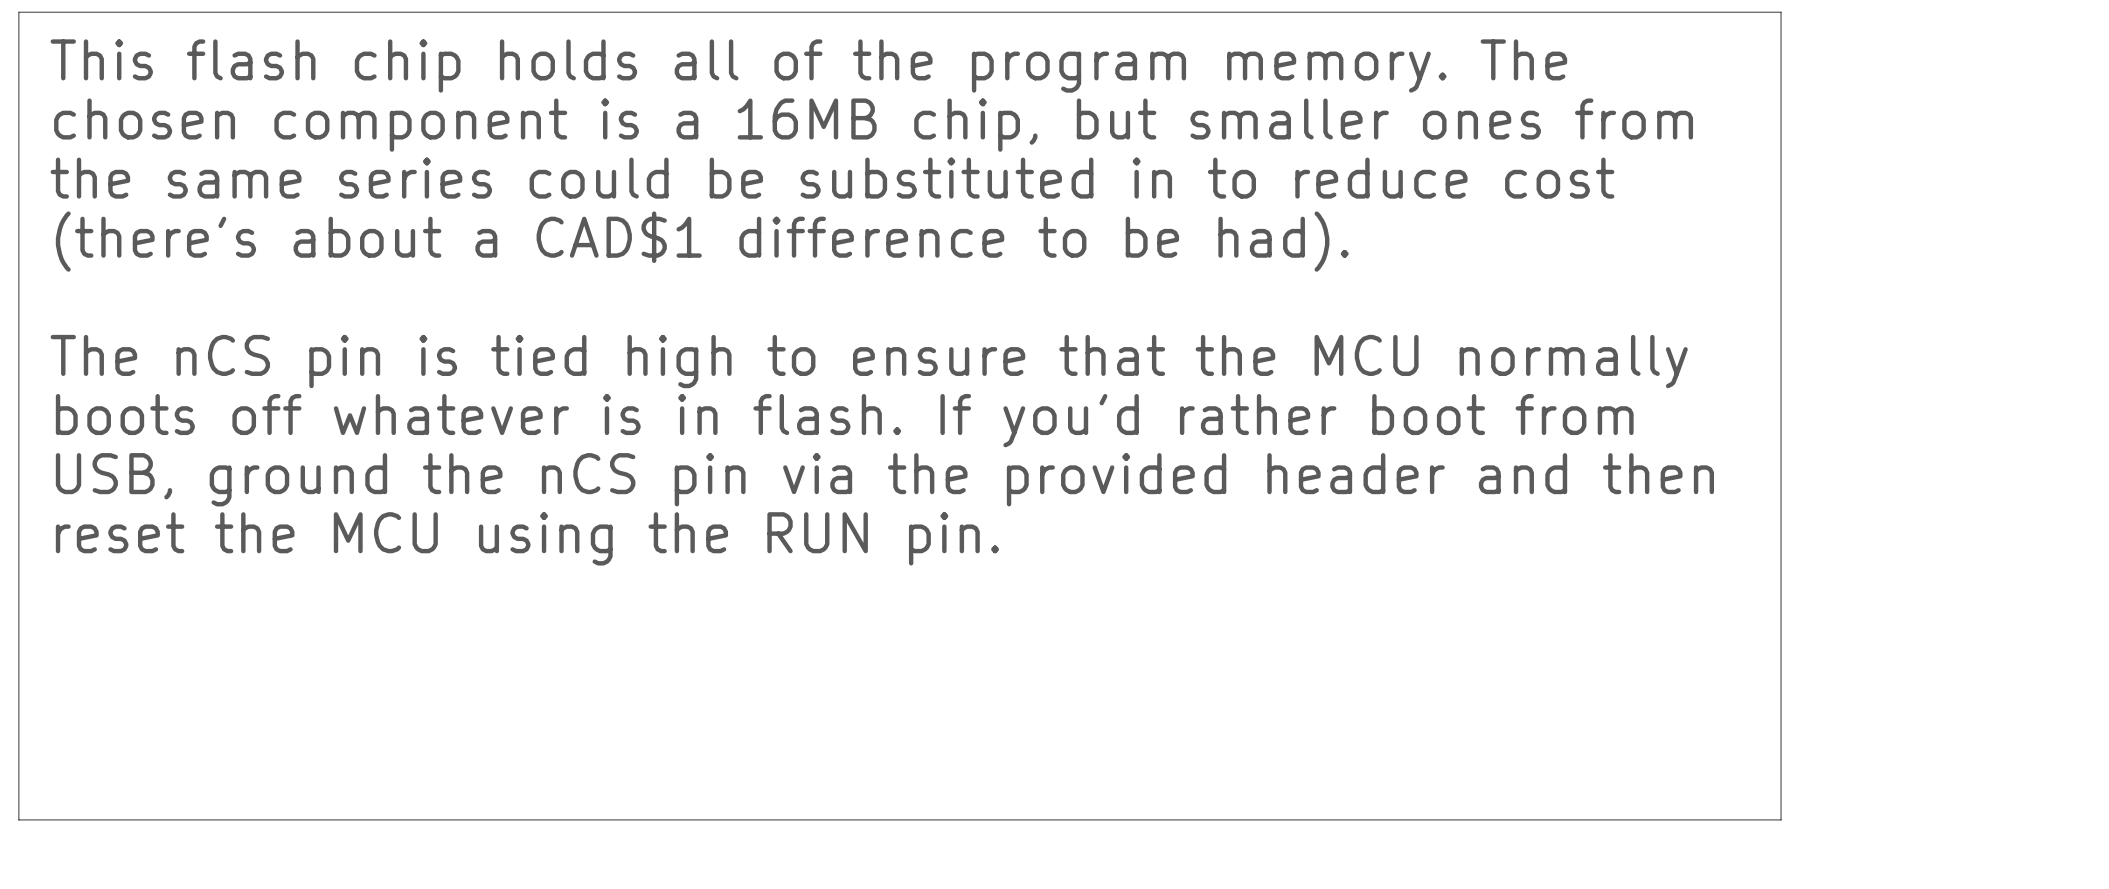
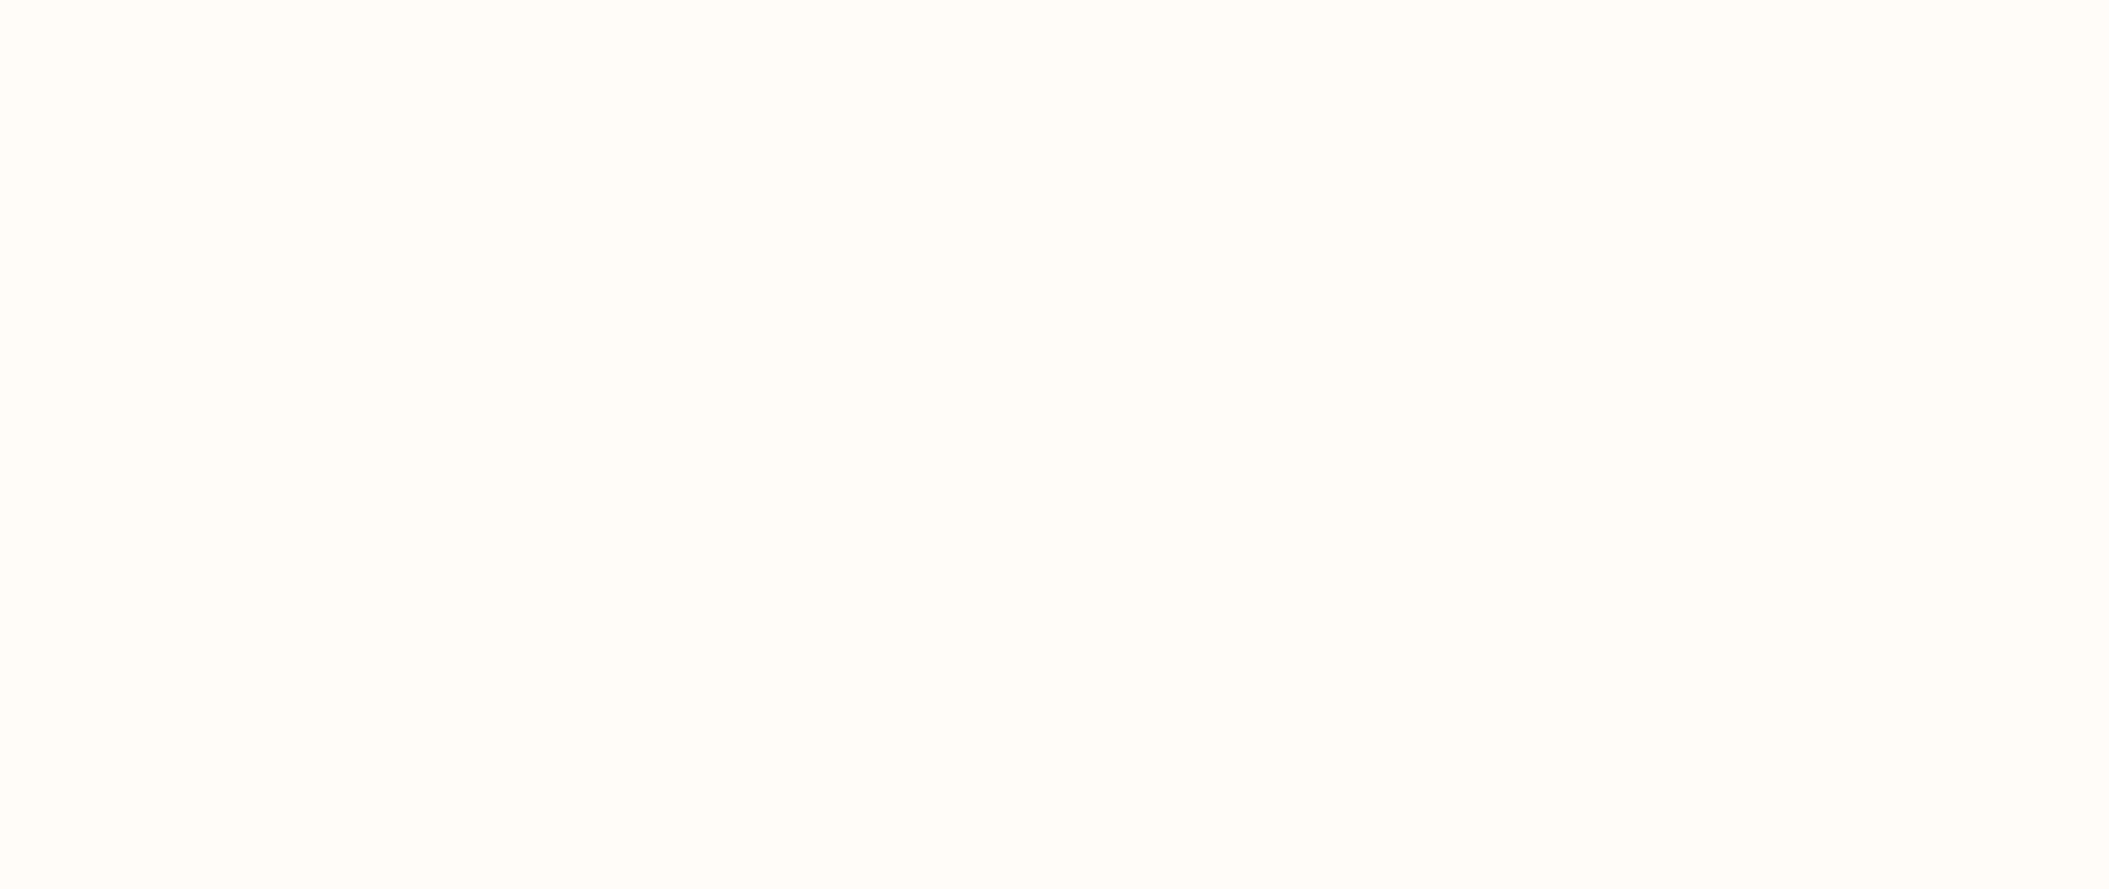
line: (18, 12) (1781, 12) (1781, 819) (18, 819) (18, 12) -> none
text: This flash chip holds all of the program memory. The (808, 66) -> none
text: chosen component is a 16MB chip, but smaller ones from (873, 125) -> none
text: the same series could be substituted in to reduce cost (832, 178) -> none
text: (there's about a CAD$1 difference to be had). (702, 241) -> none
text: The nCS pin is tied high to ensure that the MCU normally (869, 361) -> none
text: boots off whatever is in flash. If you'd rather boot from (844, 420) -> none
text: USB, ground the nCS pin via the provided header and then (884, 479) -> none
text: reset the MCU using the RUN pin. (527, 538) -> none

